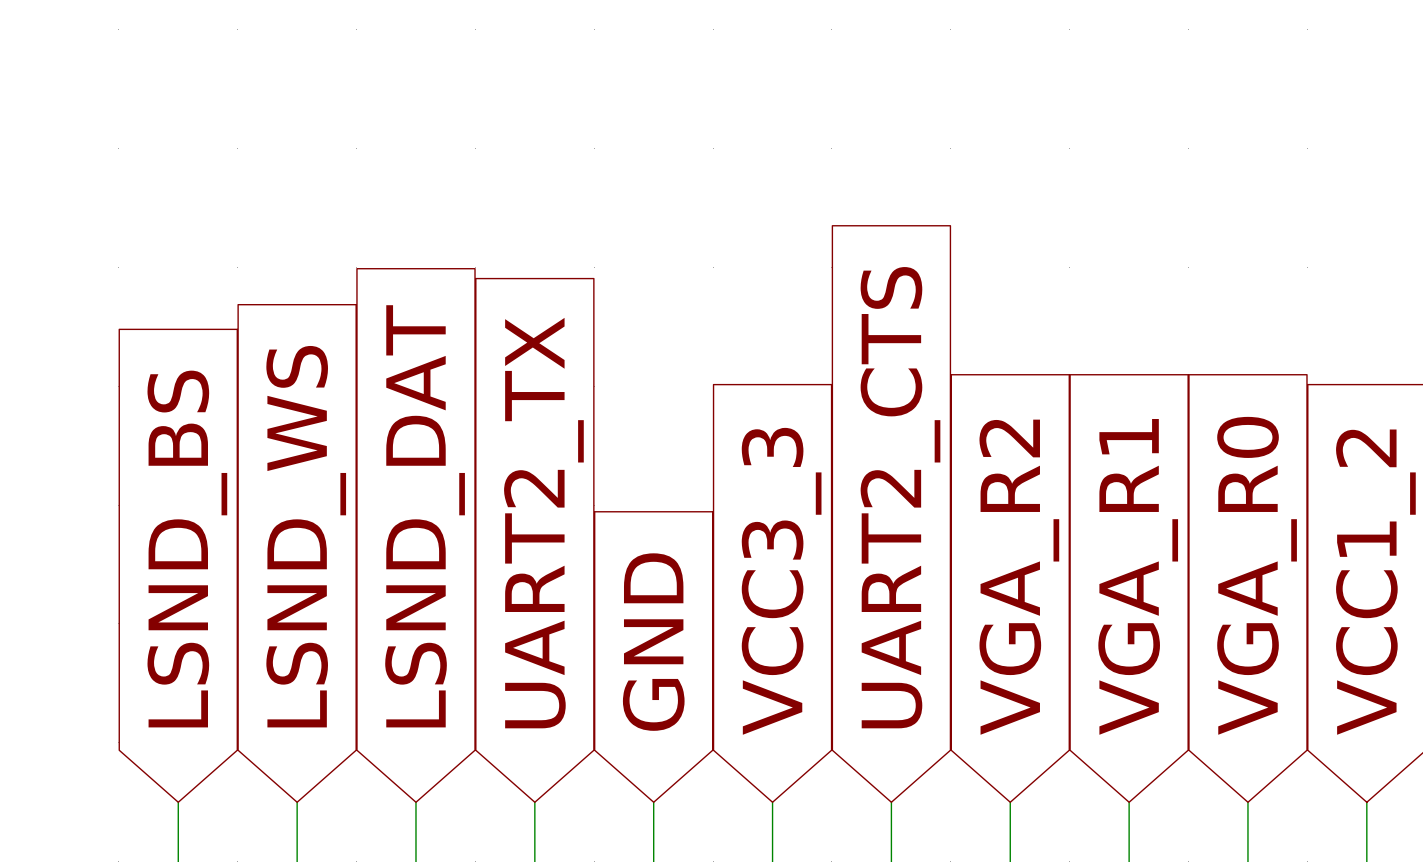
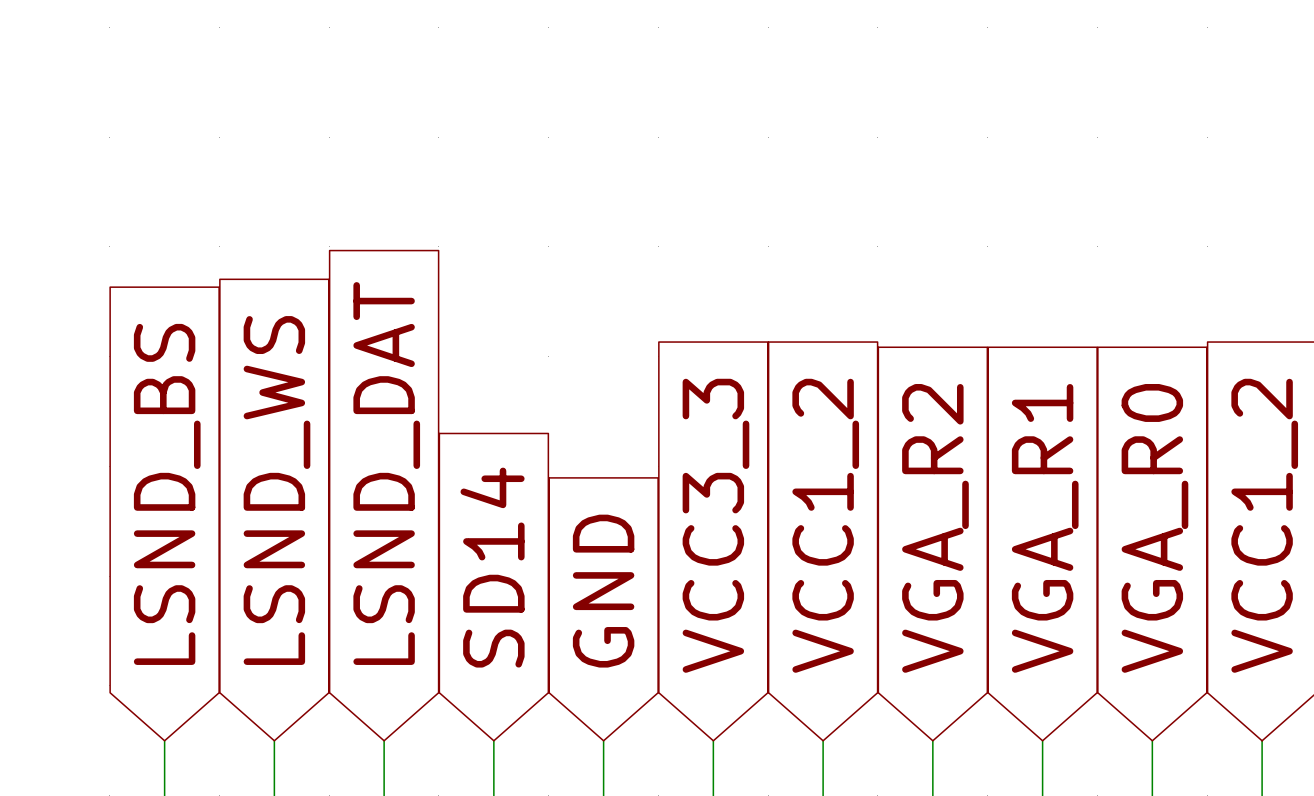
global label: UART2_CTS (900, 497) -> VCC1_2 (825, 525)
global label: UART2_TX (543, 523) -> SD14 (492, 567)

